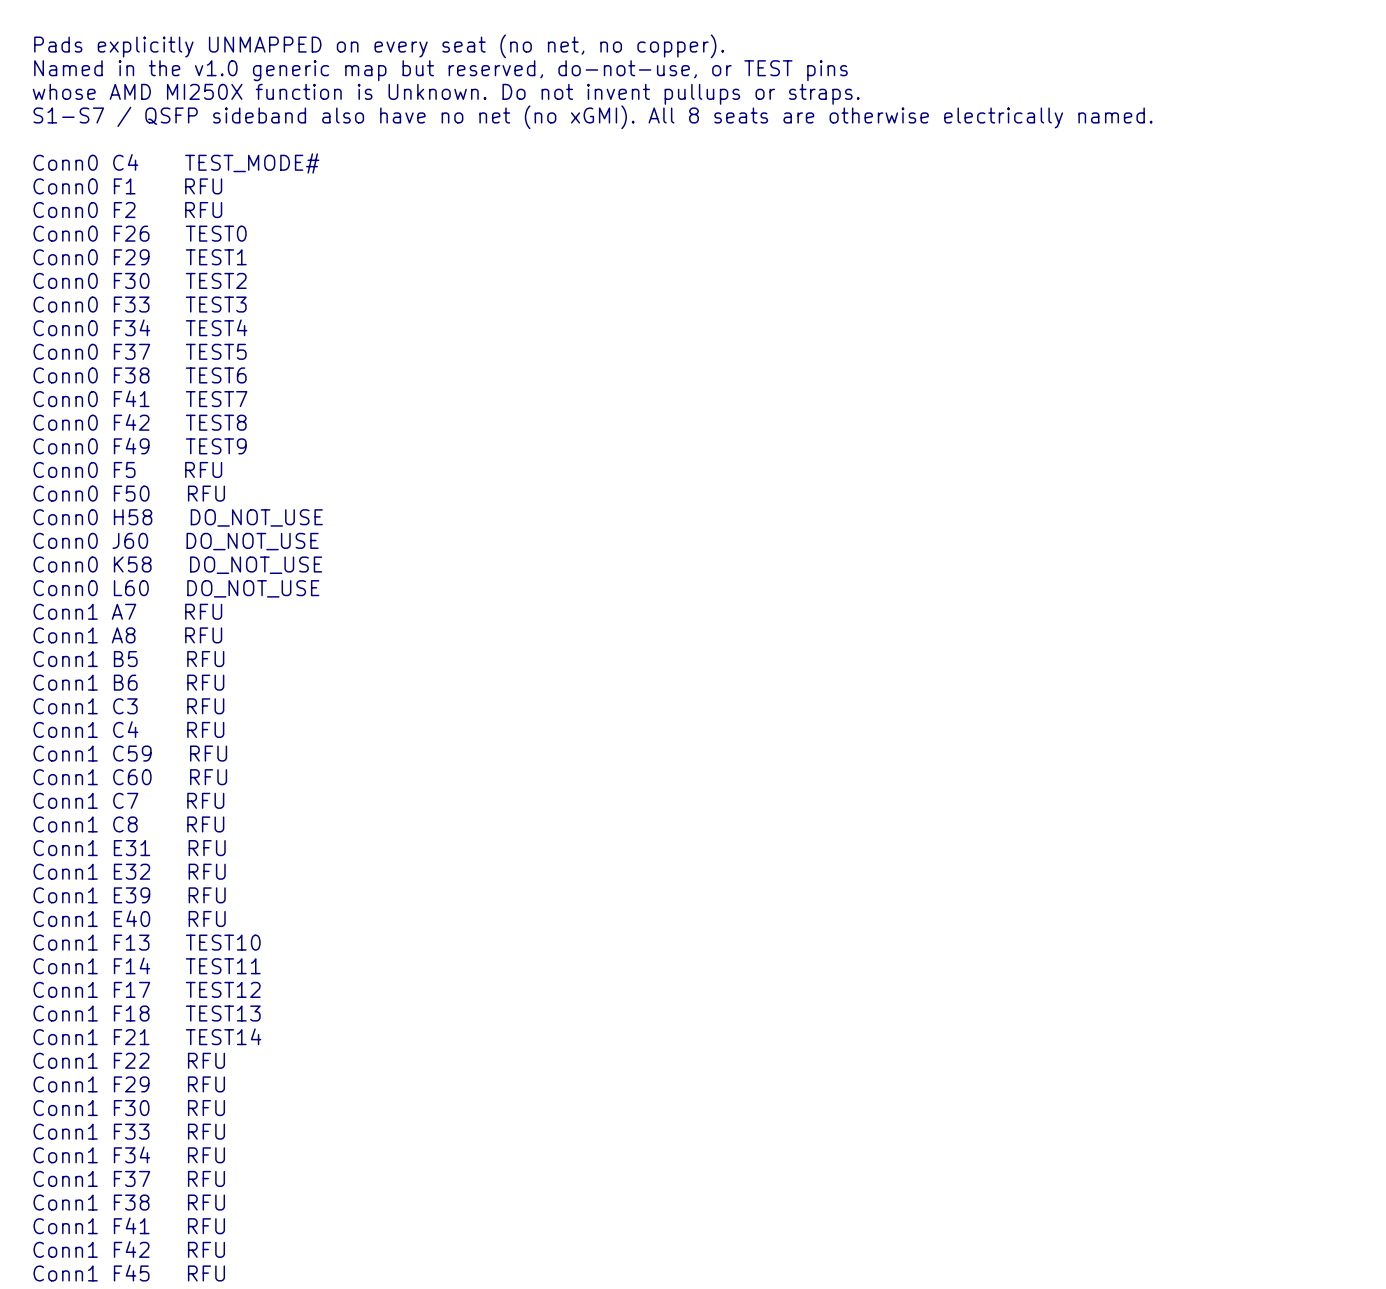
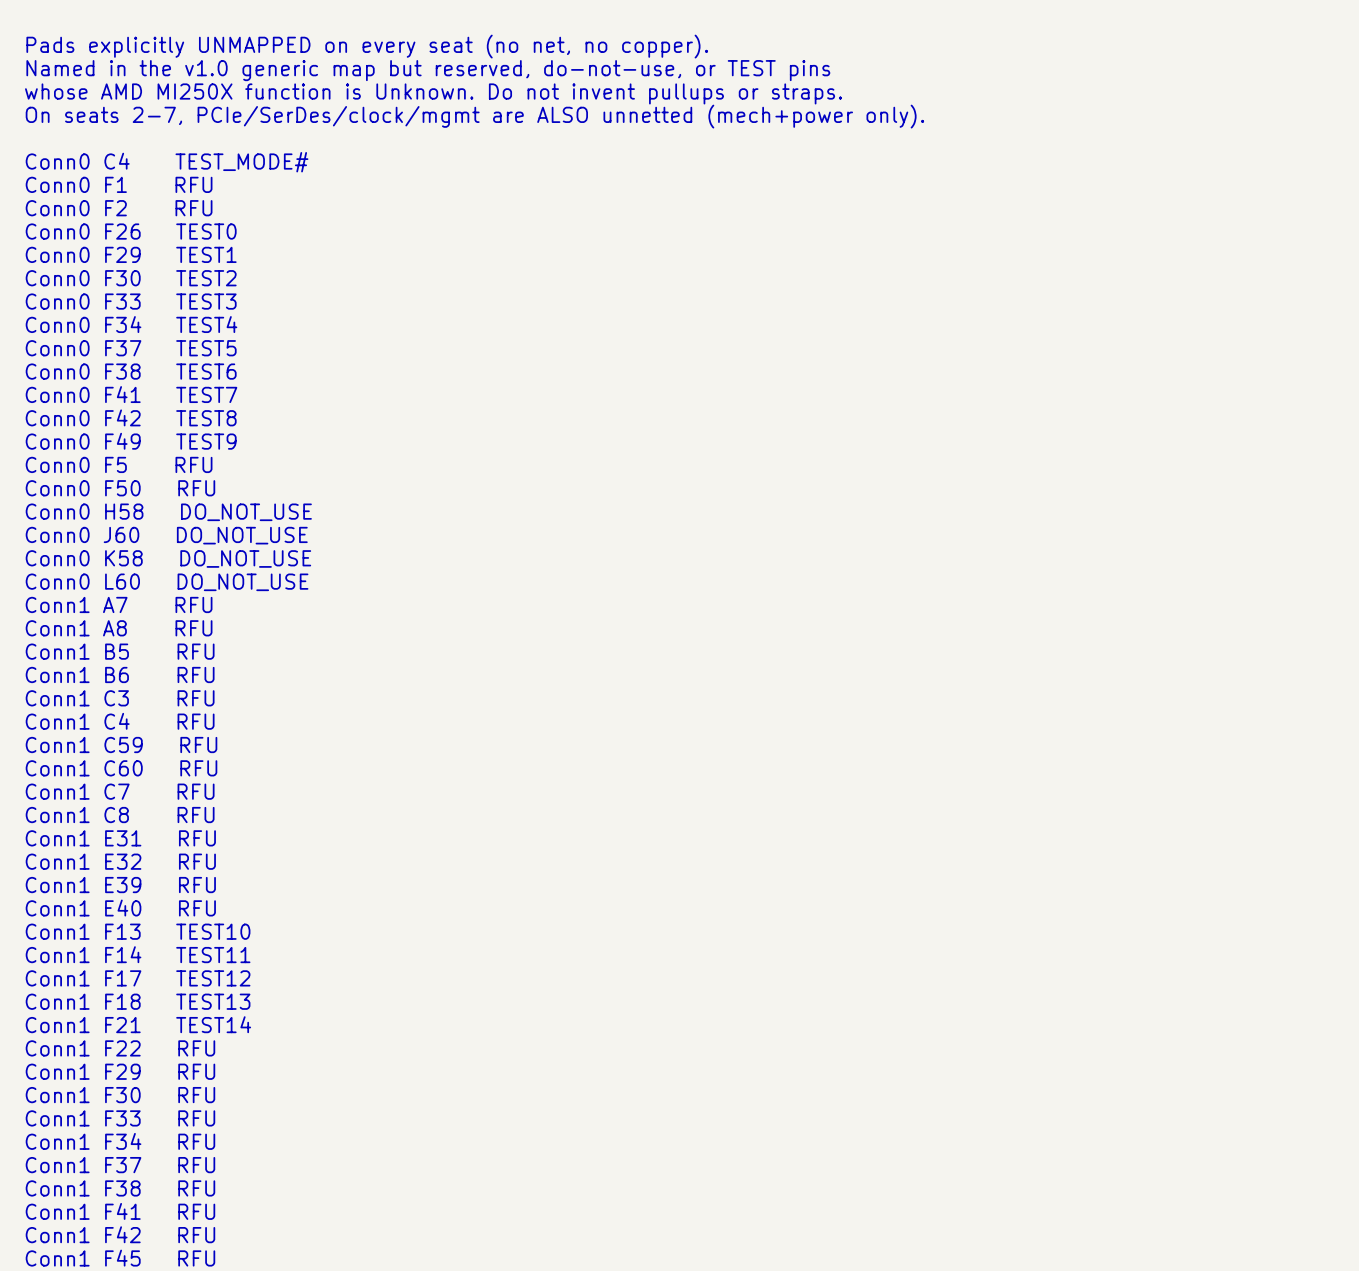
text: S1-S7 / QSFP sideband also have no net (no xGMI). All 8 seats are otherwise electrically named. (593, 117) -> On seats 2-7, PCIe/SerDes/clock/mgmt are ALSO unnetted (mech+power only). (474, 116)

